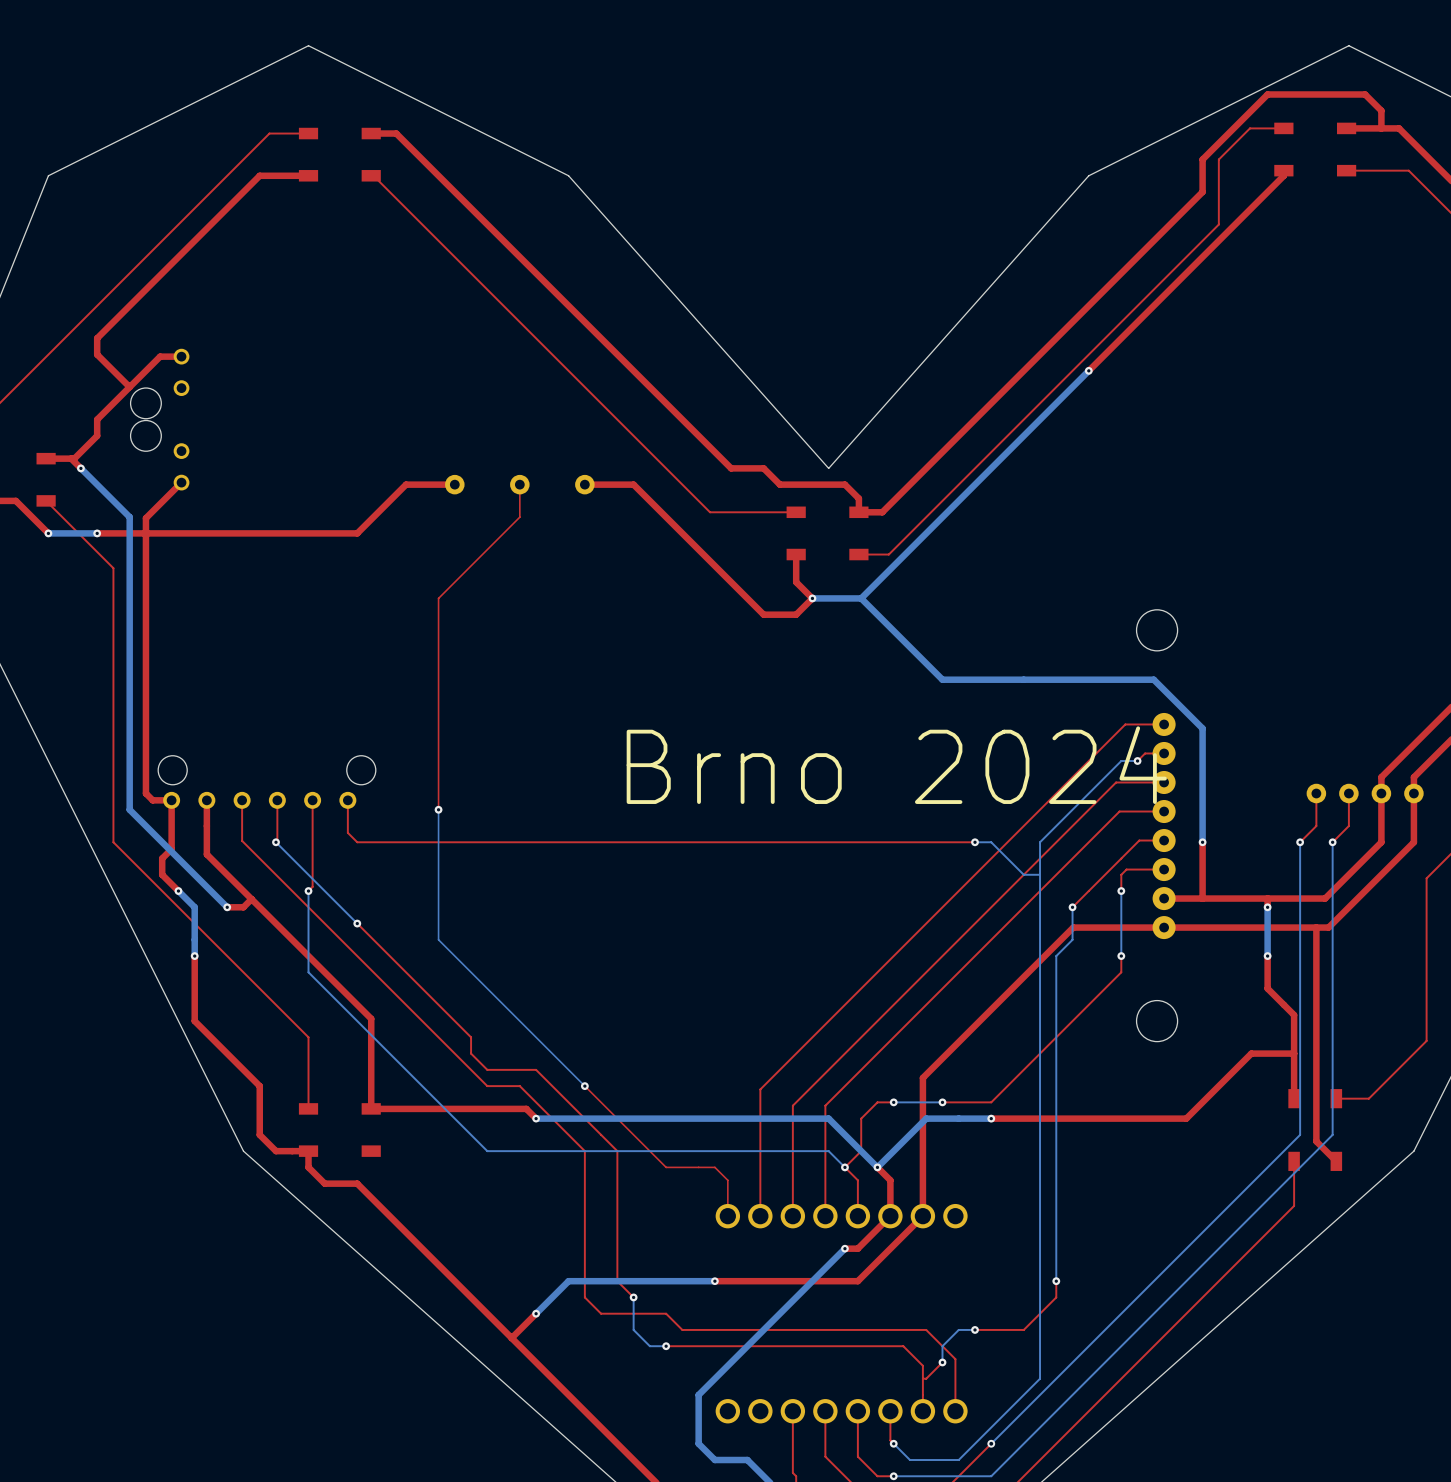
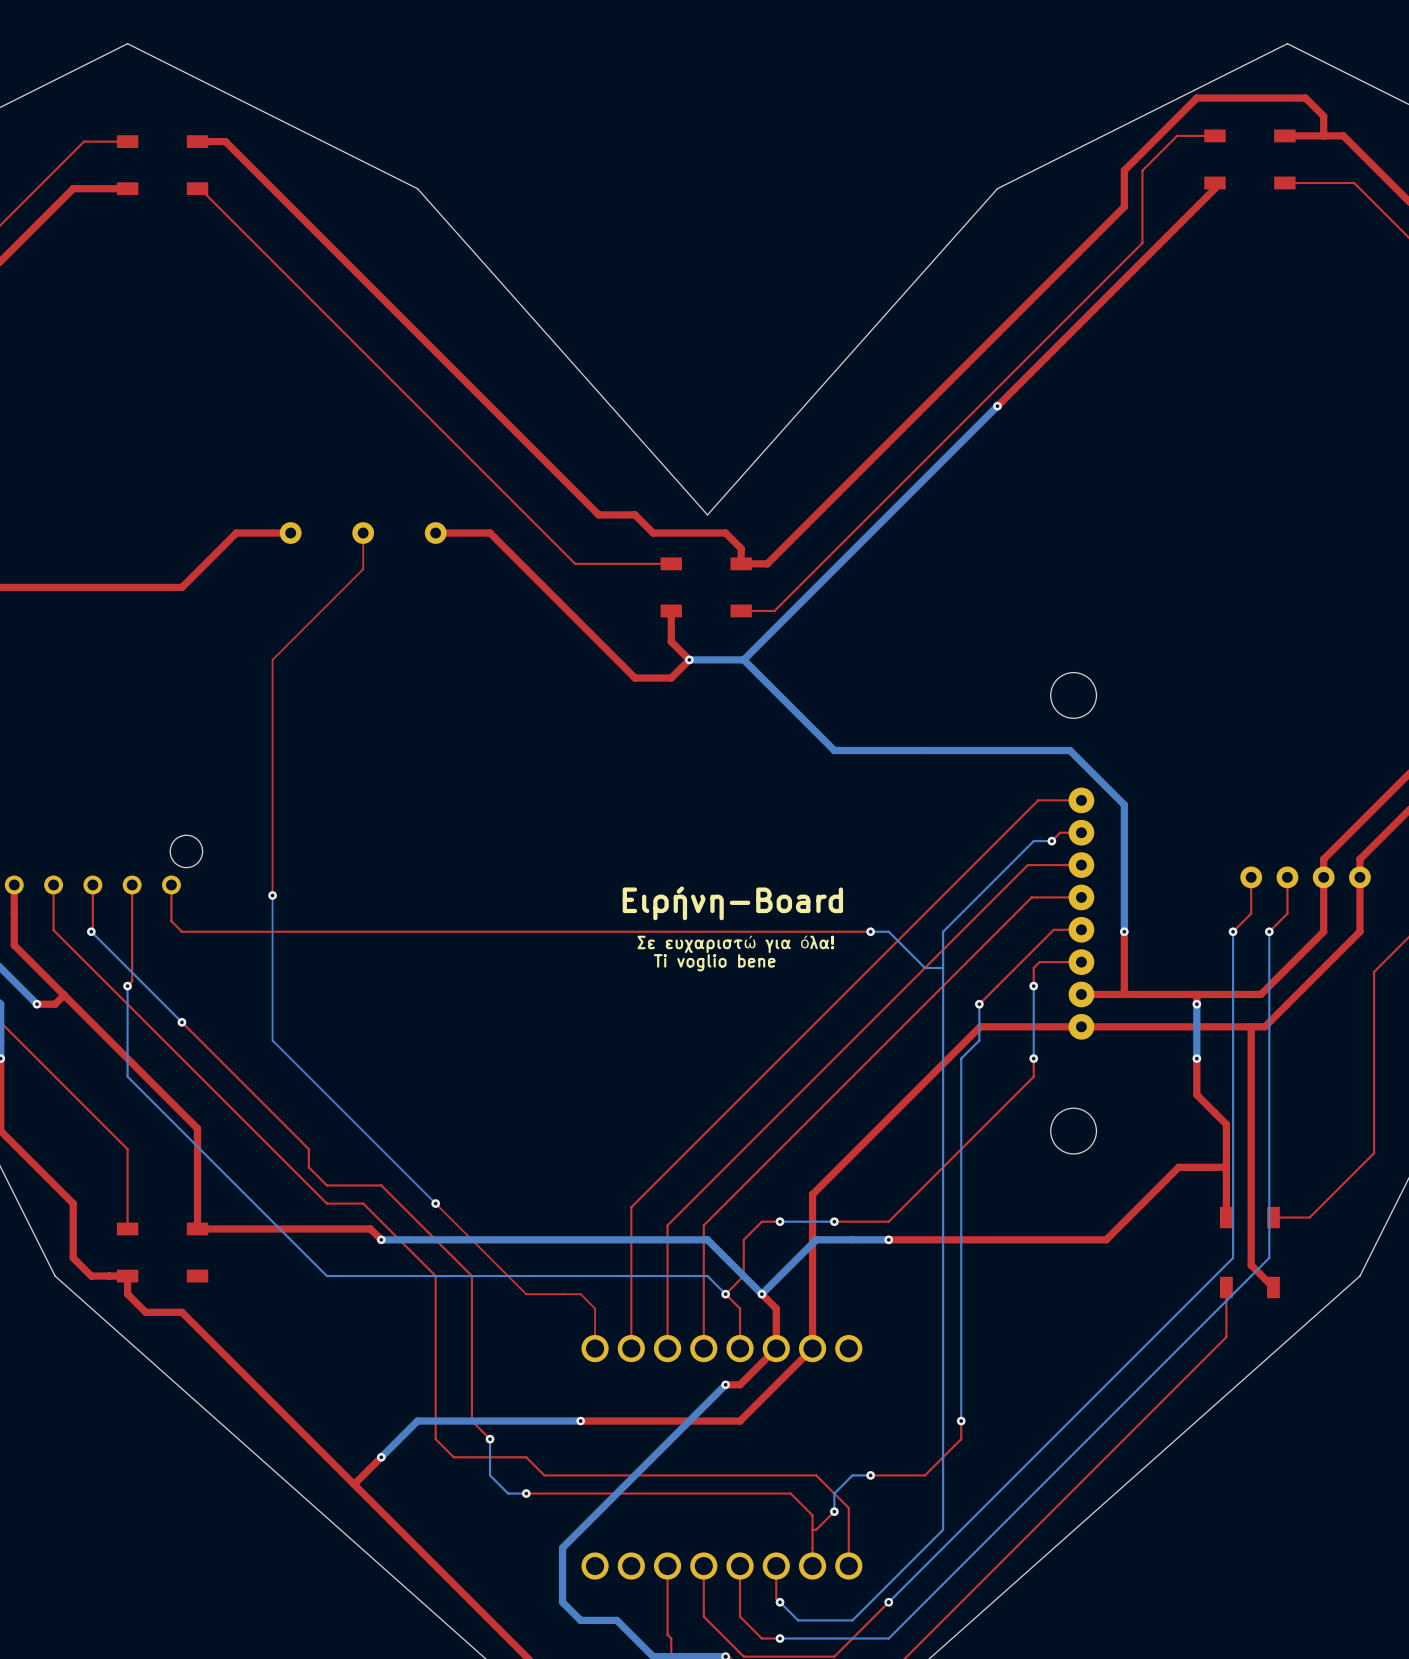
text: Brno 2024 (896, 765) -> none
text: none -> Ειρήνη-Board (732, 903)
text: none -> Σε ευχαριστώ για όλα! (735, 943)
text: none -> Ti voglio bene (714, 962)

